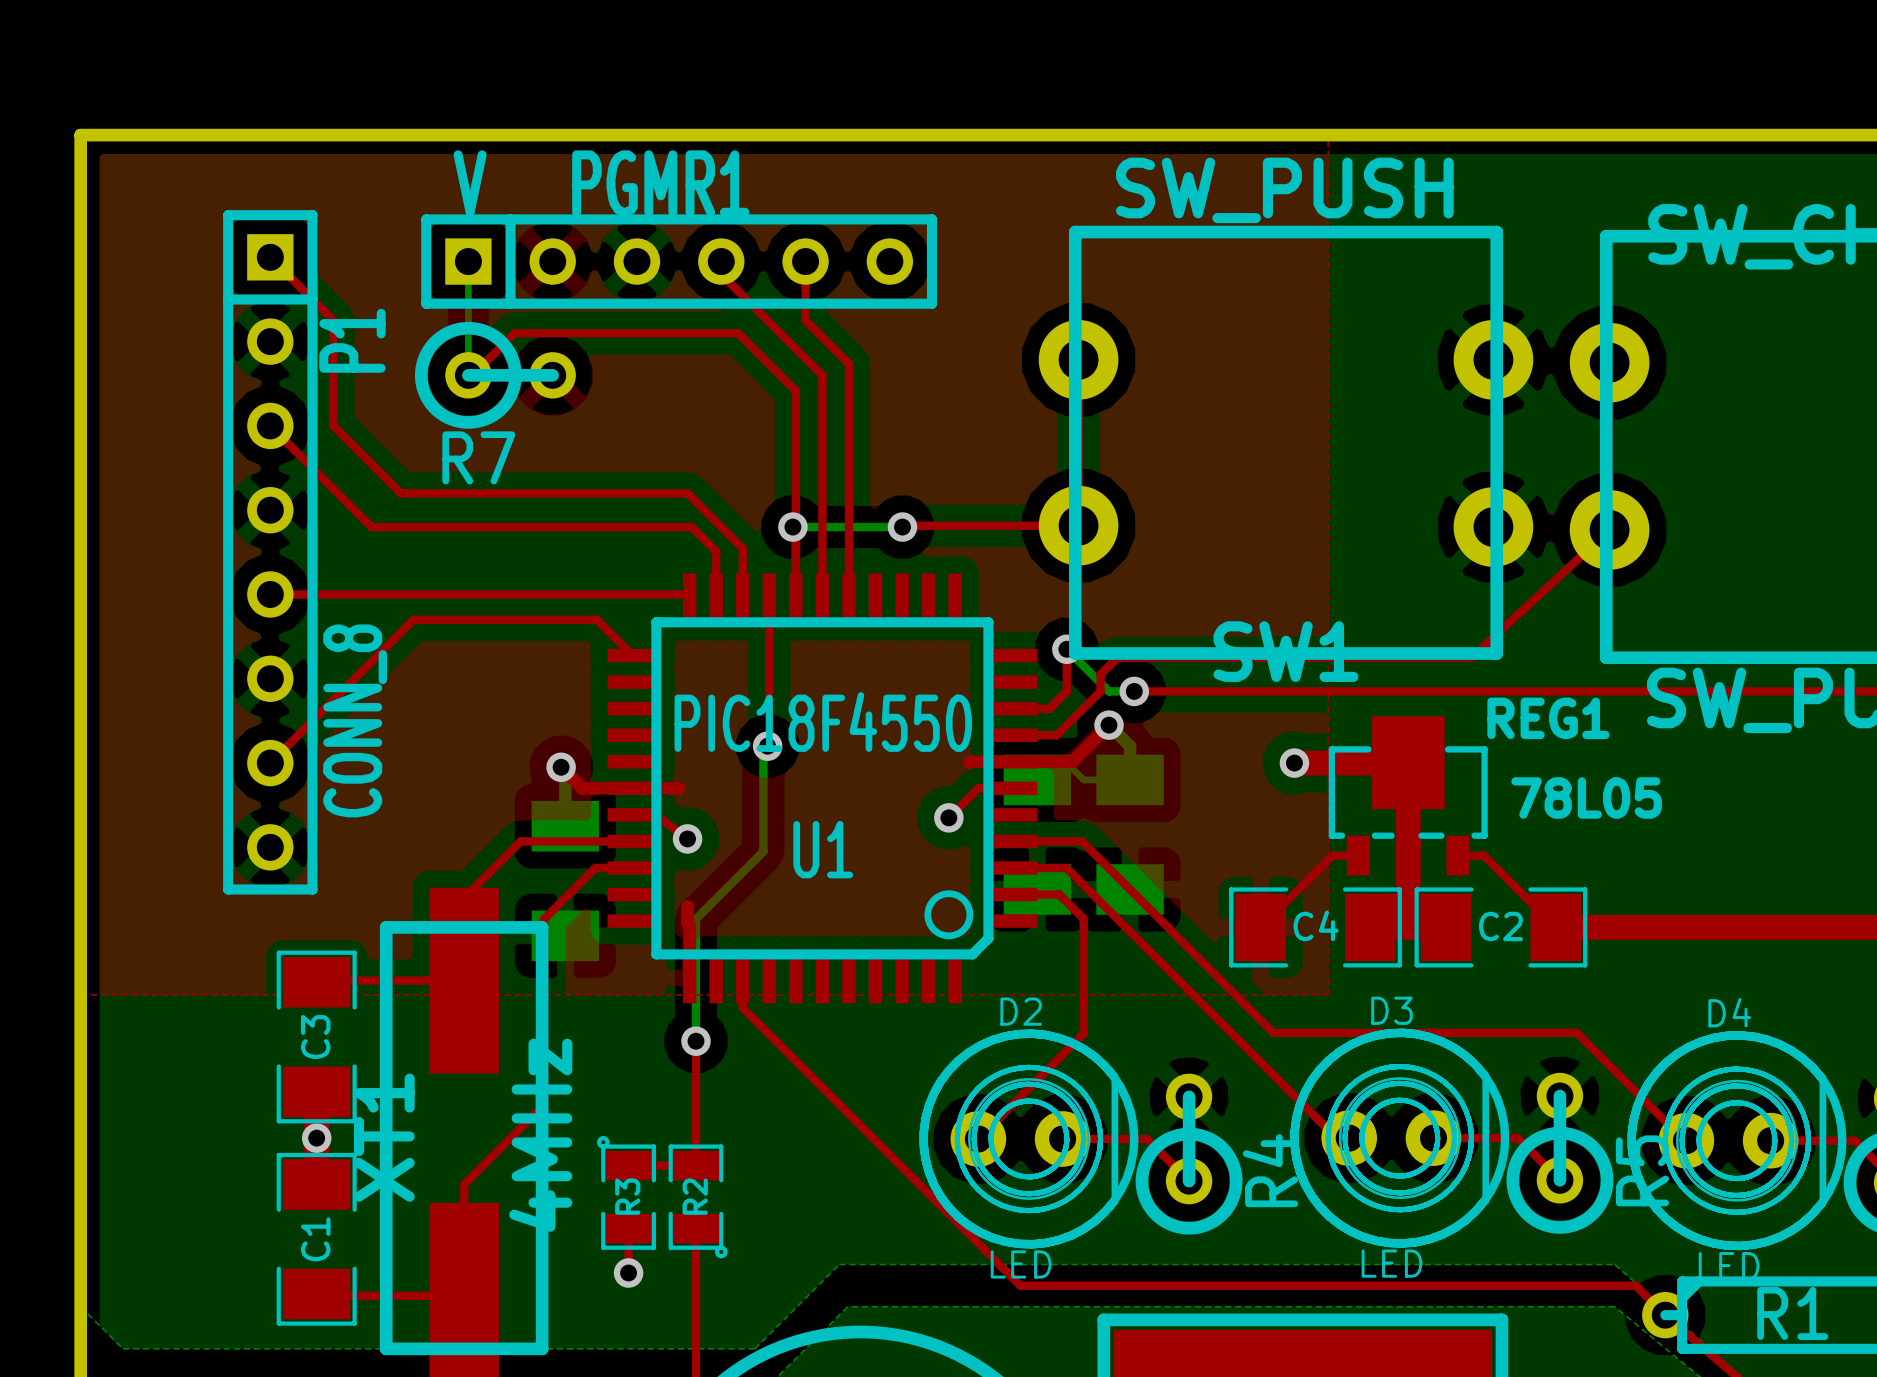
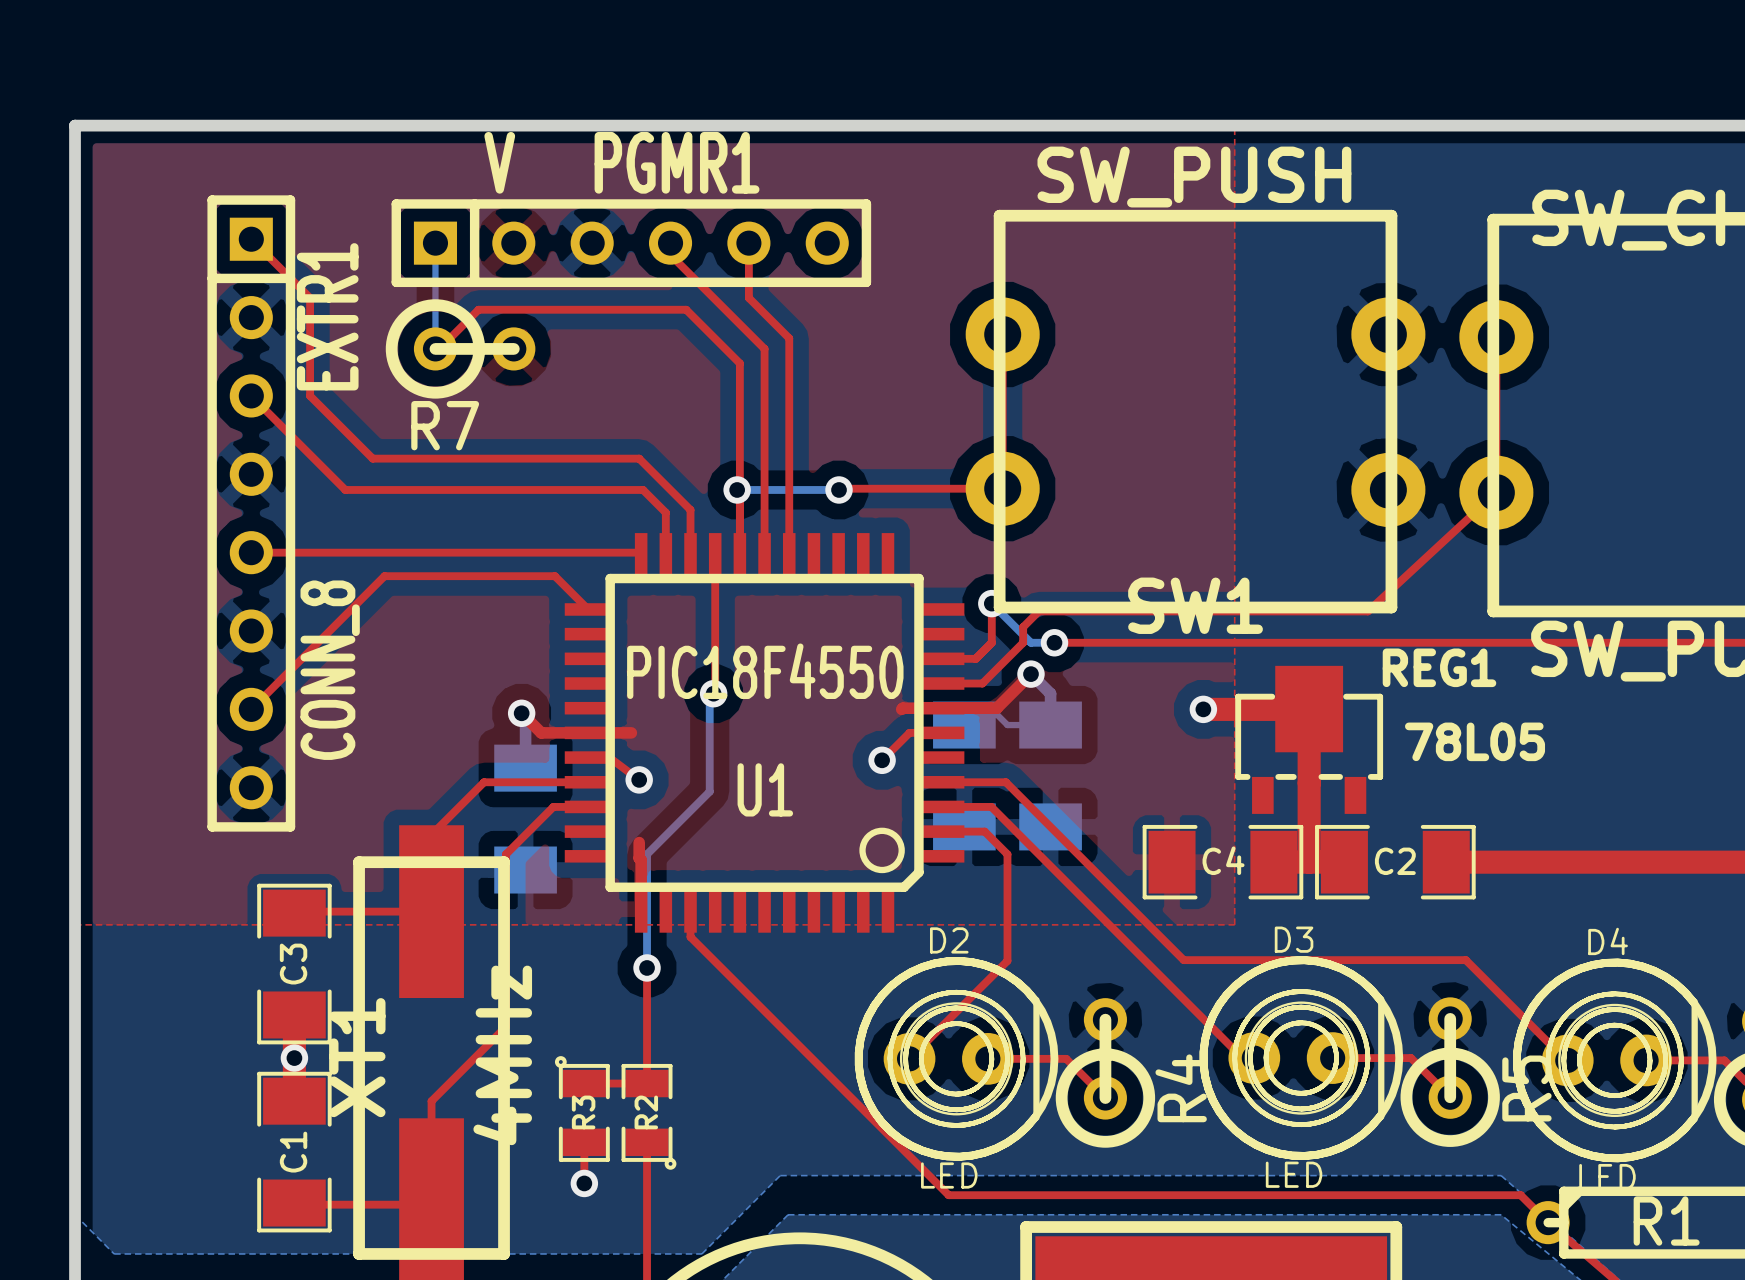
V PGMR1 name position: V PGMR1 (601, 183) -> V PGMR1 (621, 162)
P1 name: P1 (352, 340) -> EXTR1 (327, 316)
top track: (1358, 855) (1332, 855) (1260, 927) -> none
top track: (1458, 855) (1483, 855) (1555, 927) -> none

